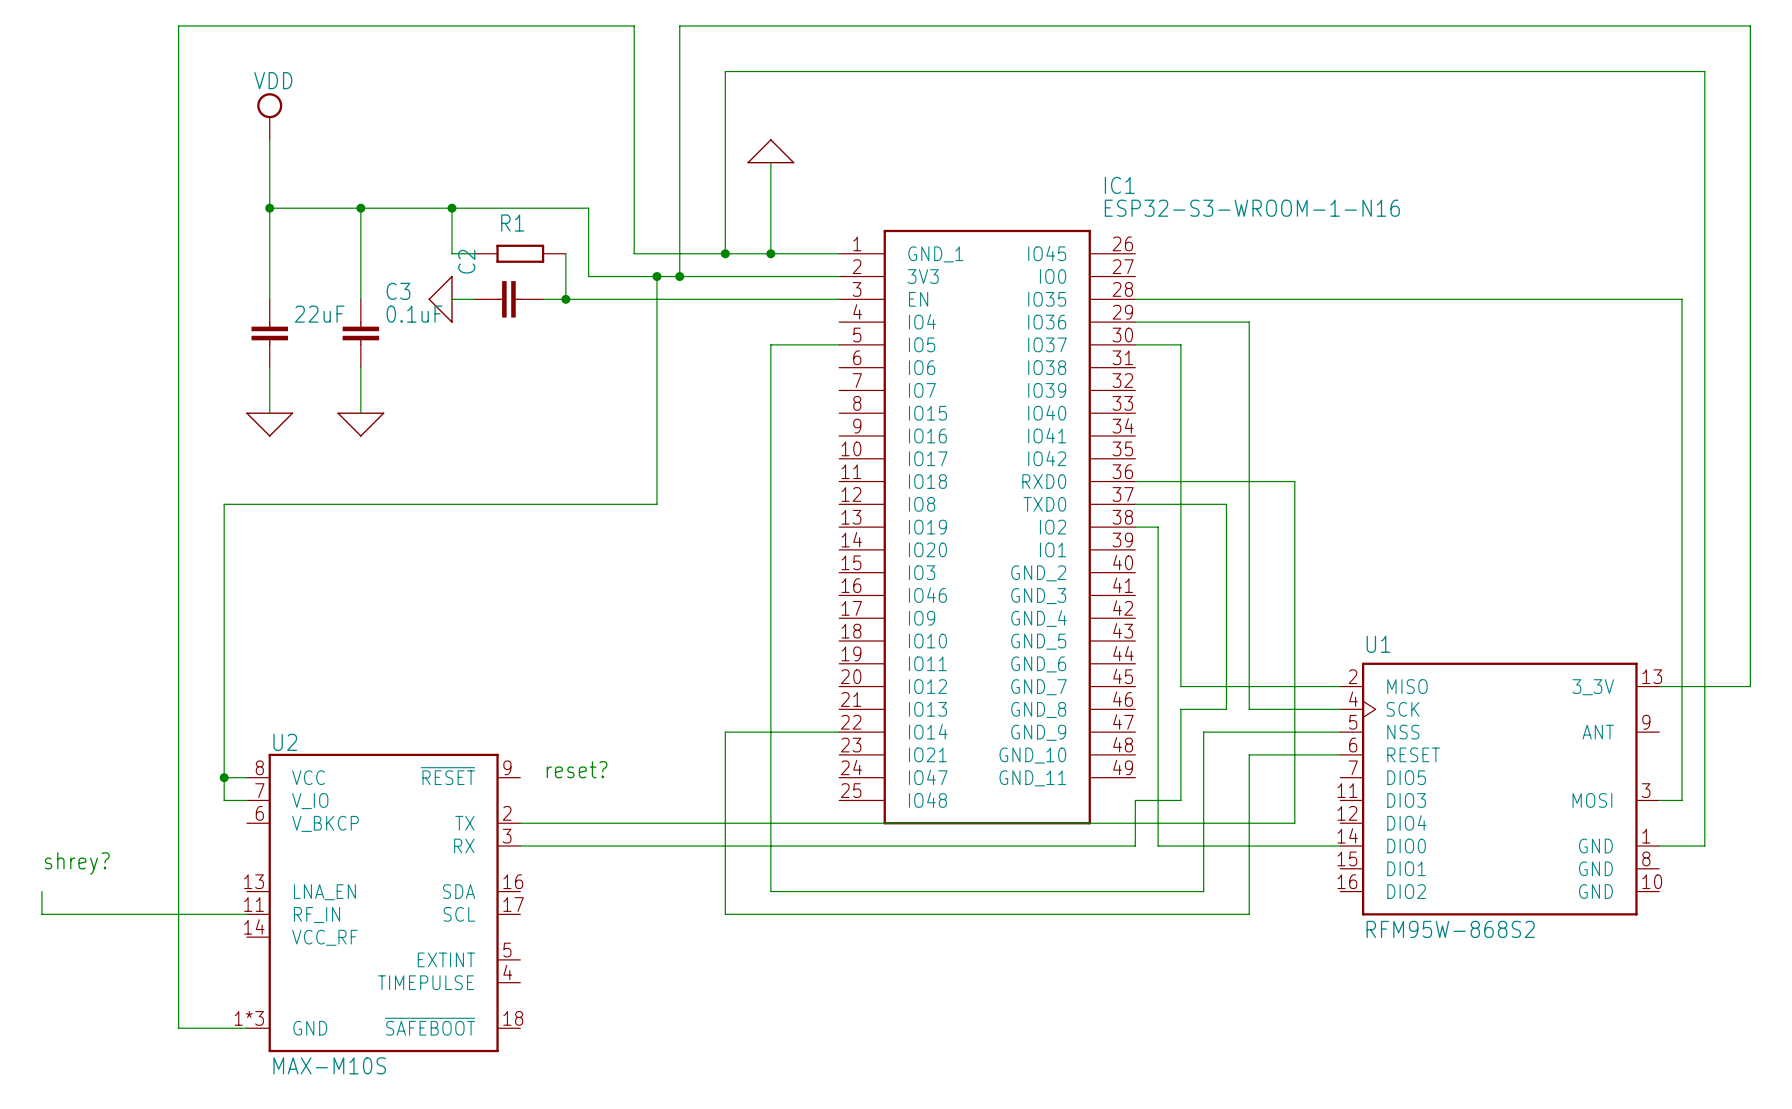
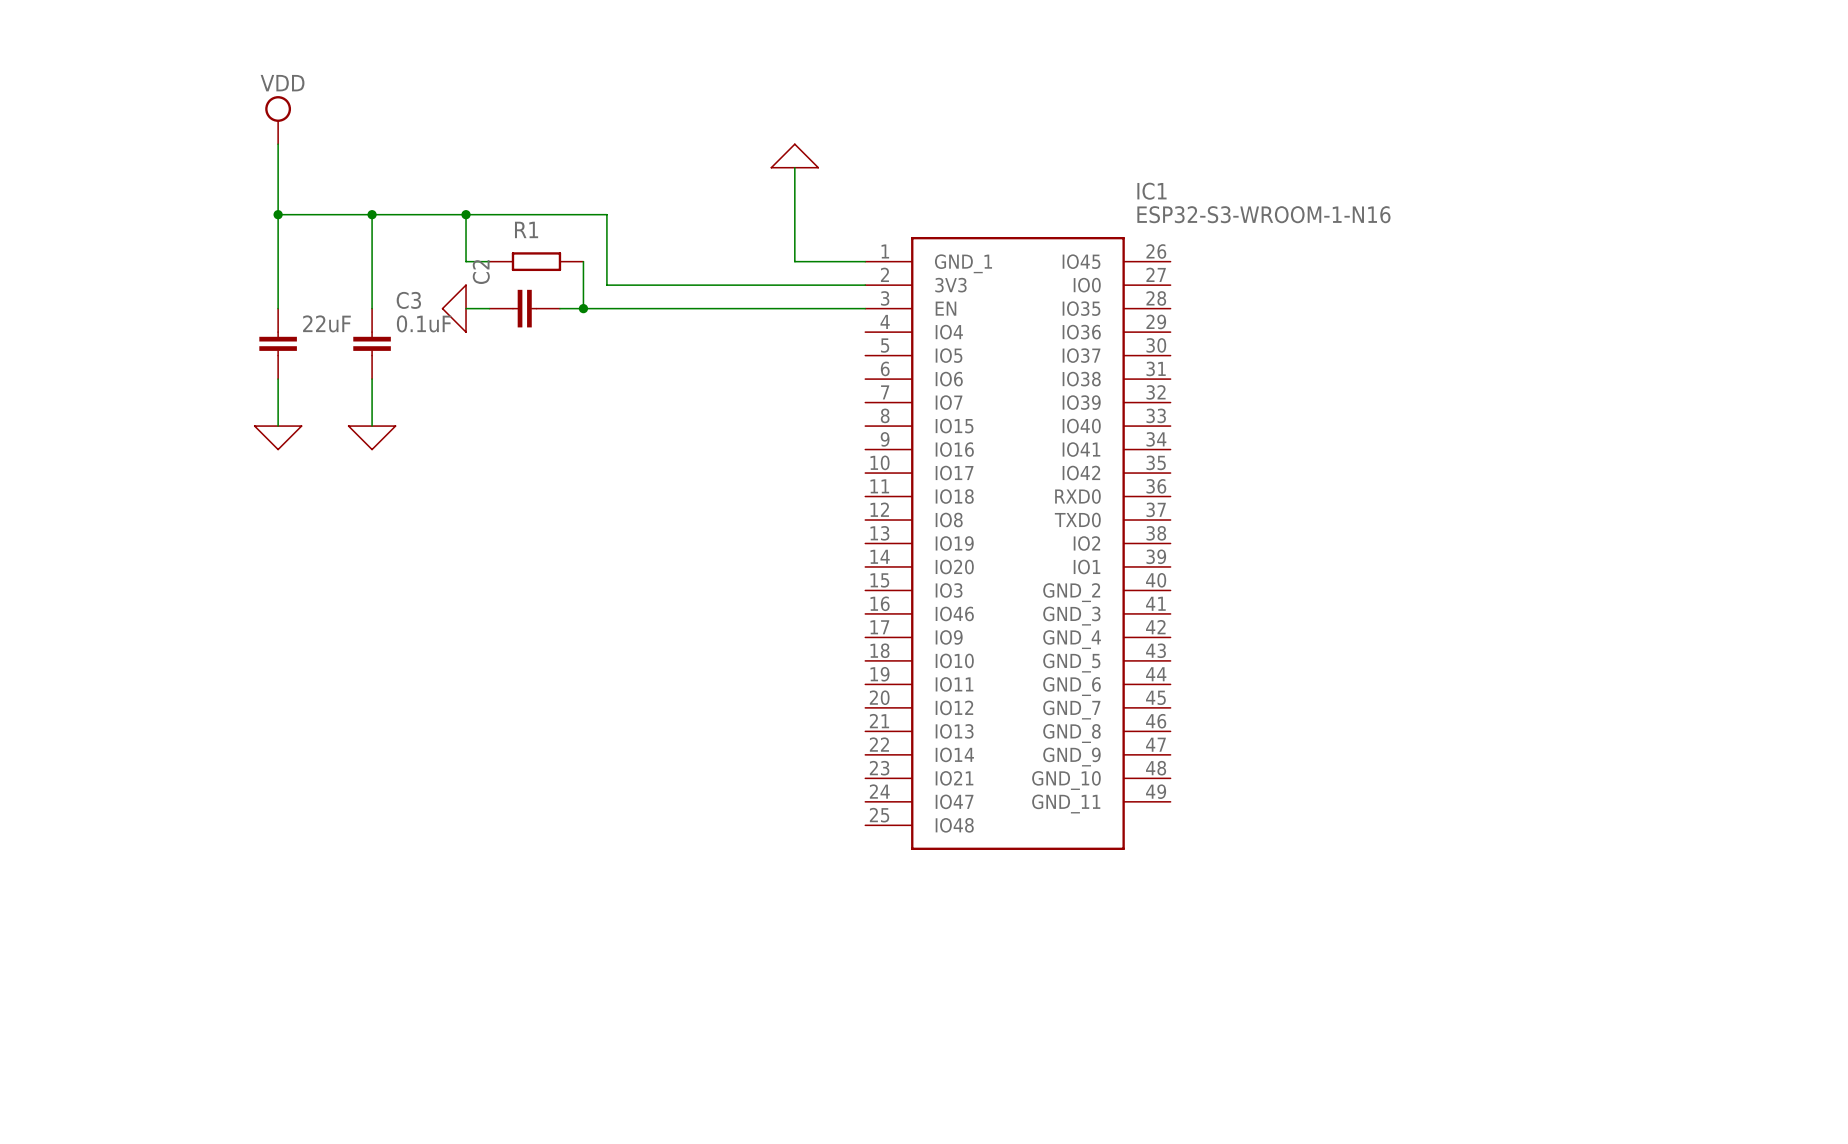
wire: (725, 253) (725, 71) (1704, 71) (1704, 846) (1659, 846) -> none
junction: (725, 253) -> none
wire: (770, 253) (634, 253) (634, 25) (178, 25) (178, 1028) (246, 1028) -> none
junction: (770, 253) -> none
wire: (656, 276) (656, 504) (224, 504) (224, 800) (246, 800) -> none
junction: (656, 276) -> none
wire: (679, 276) (679, 25) (1750, 25) (1750, 686) (1659, 686) -> none
junction: (679, 276) -> none
wire: (1135, 299) (1682, 299) (1682, 800) (1659, 800) -> none
wire: (1135, 322) (1249, 322) (1249, 709) (1340, 709) -> none
wire: (839, 344) (770, 344) (770, 891) (1203, 891) (1203, 732) (1340, 732) -> none
wire: (1135, 344) (1180, 344) (1180, 686) (1340, 686) -> none
wire: (1135, 481) (1294, 481) (1294, 823) (520, 823) -> none
wire: (1135, 504) (1226, 504) (1226, 709) (1180, 709) (1180, 800) (1135, 800) (1135, 846) (520, 846) -> none
wire: (1135, 527) (1158, 527) (1158, 846) (1340, 846) -> none
wire: (839, 732) (725, 732) (725, 914) (1249, 914) (1249, 754) (1340, 754) -> none
text: reset? (577, 769) -> none
wire: (224, 777) (246, 777) -> none
junction: (224, 777) -> none
U1: RFM95W-868S2 (1499, 789) -> none
text: shrey? (77, 863) -> none
wire: (41, 891) (41, 914) (246, 914) -> none
U2: MAX-M10S (383, 902) -> none

